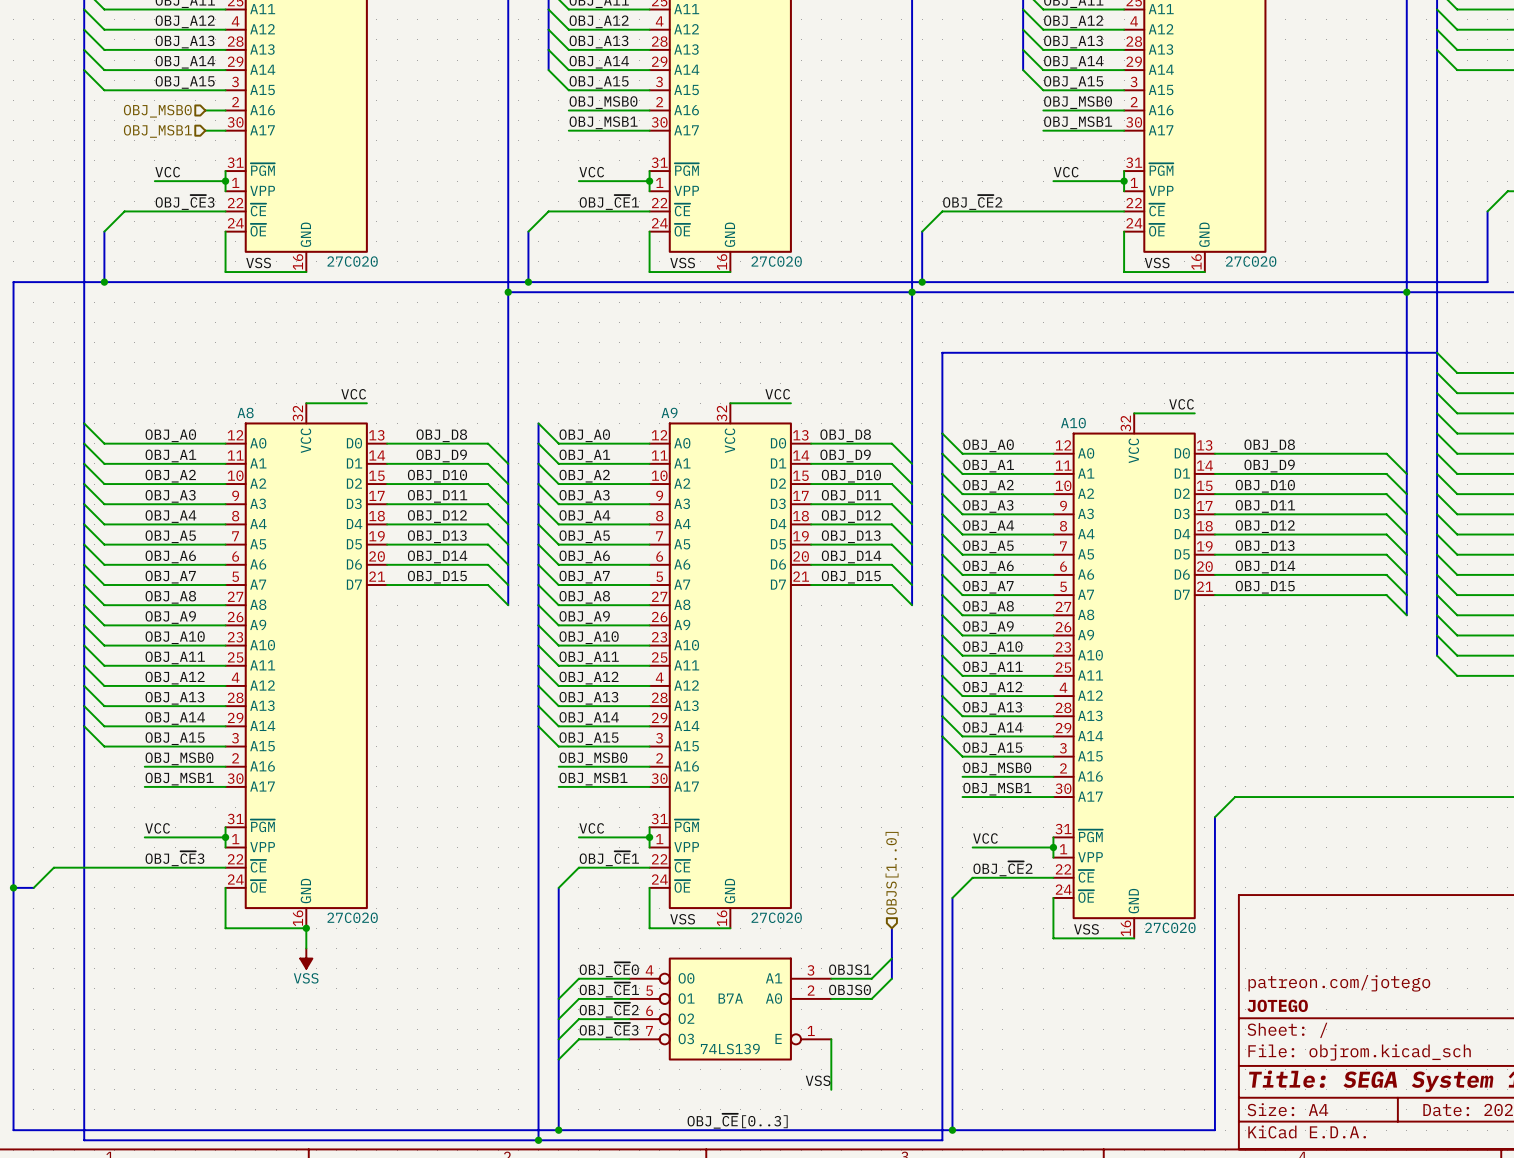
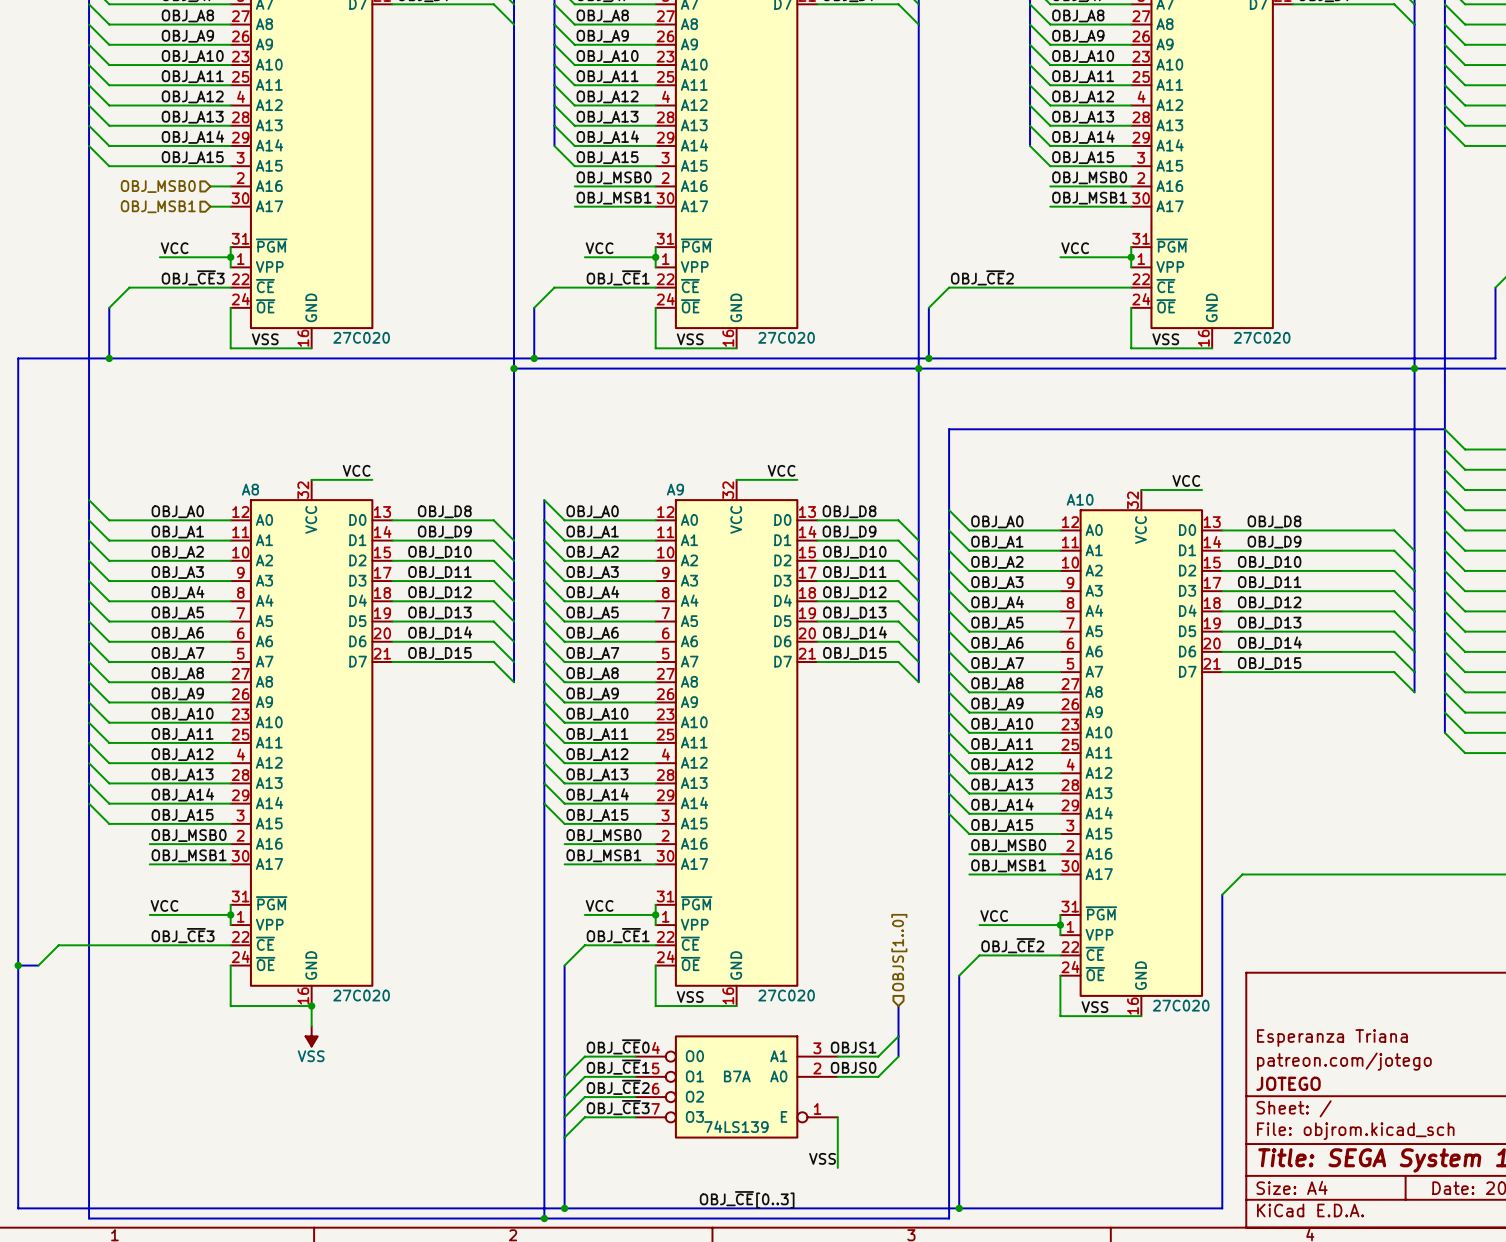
title block: none -> Esperanza Triana (1332, 1038)

